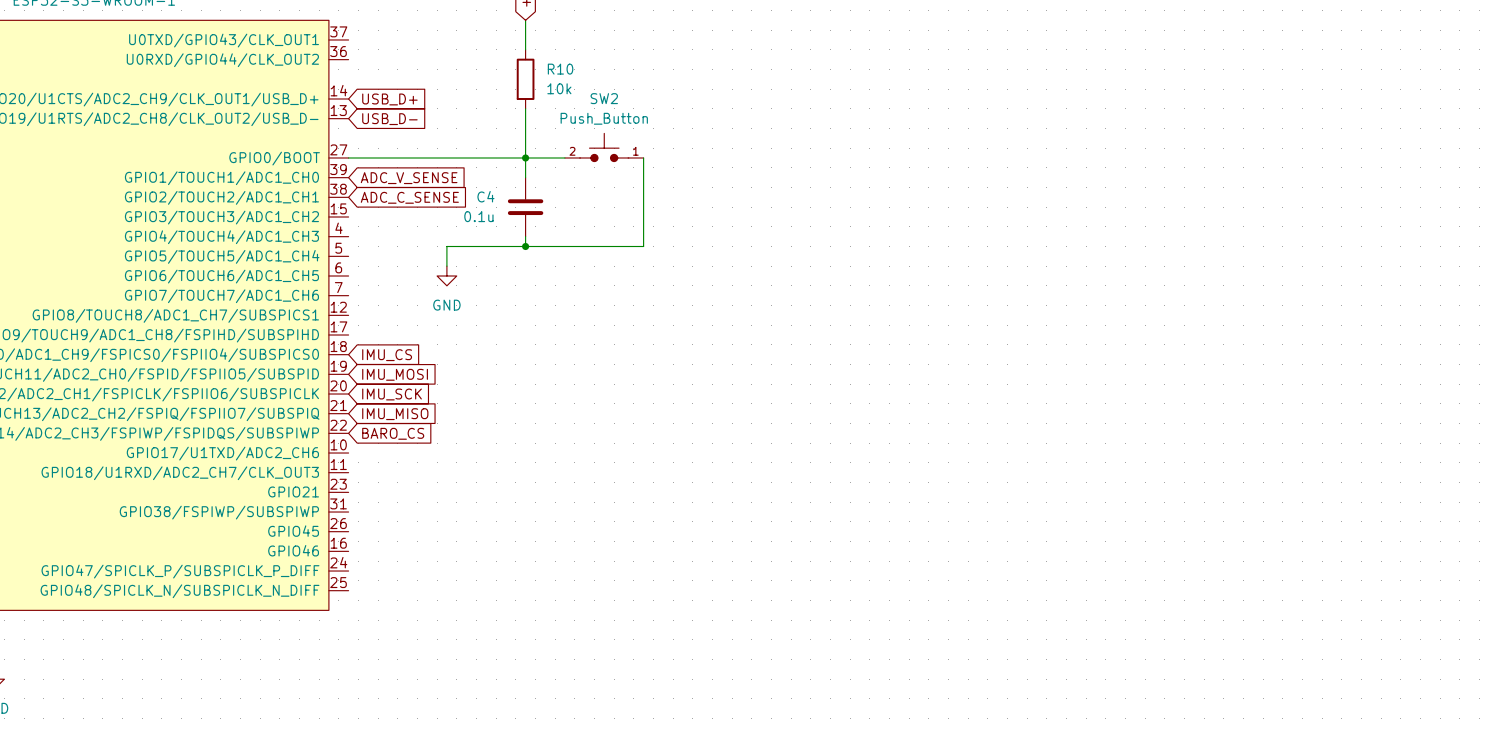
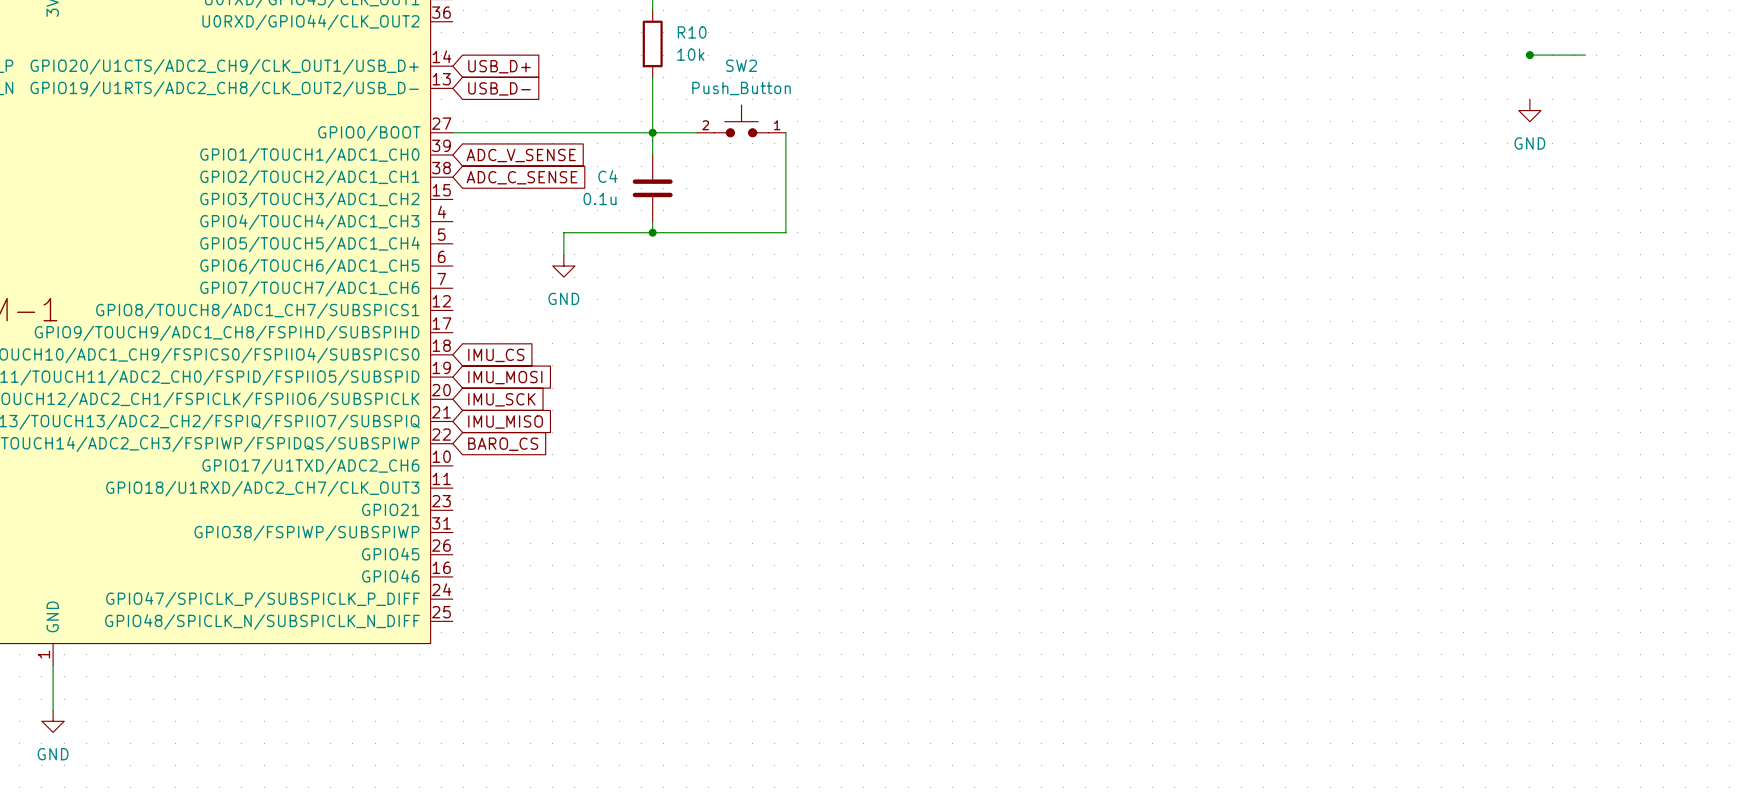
wire: none -> (1529, 55) (1585, 55)
junction: none -> (1529, 55)
power symbol: none -> GND (1529, 110)

